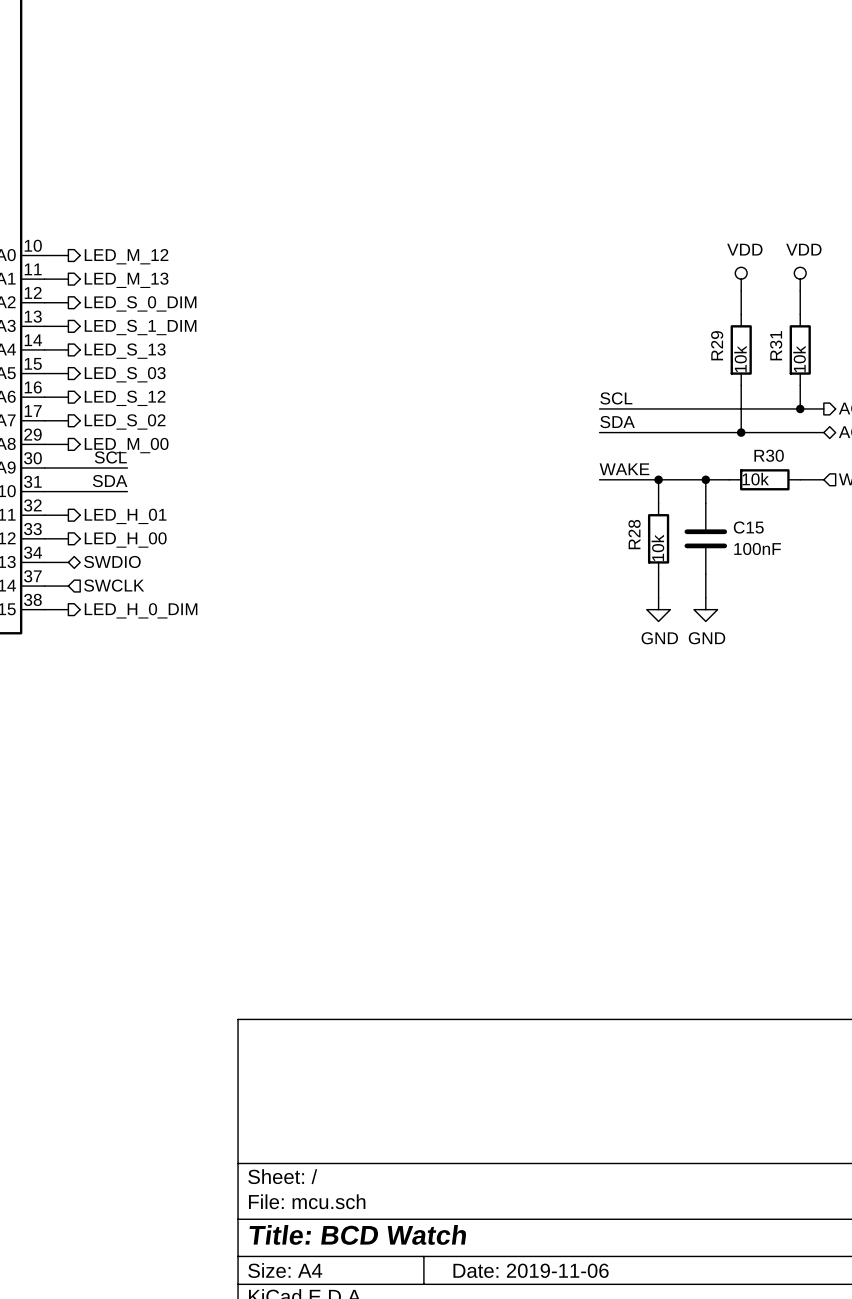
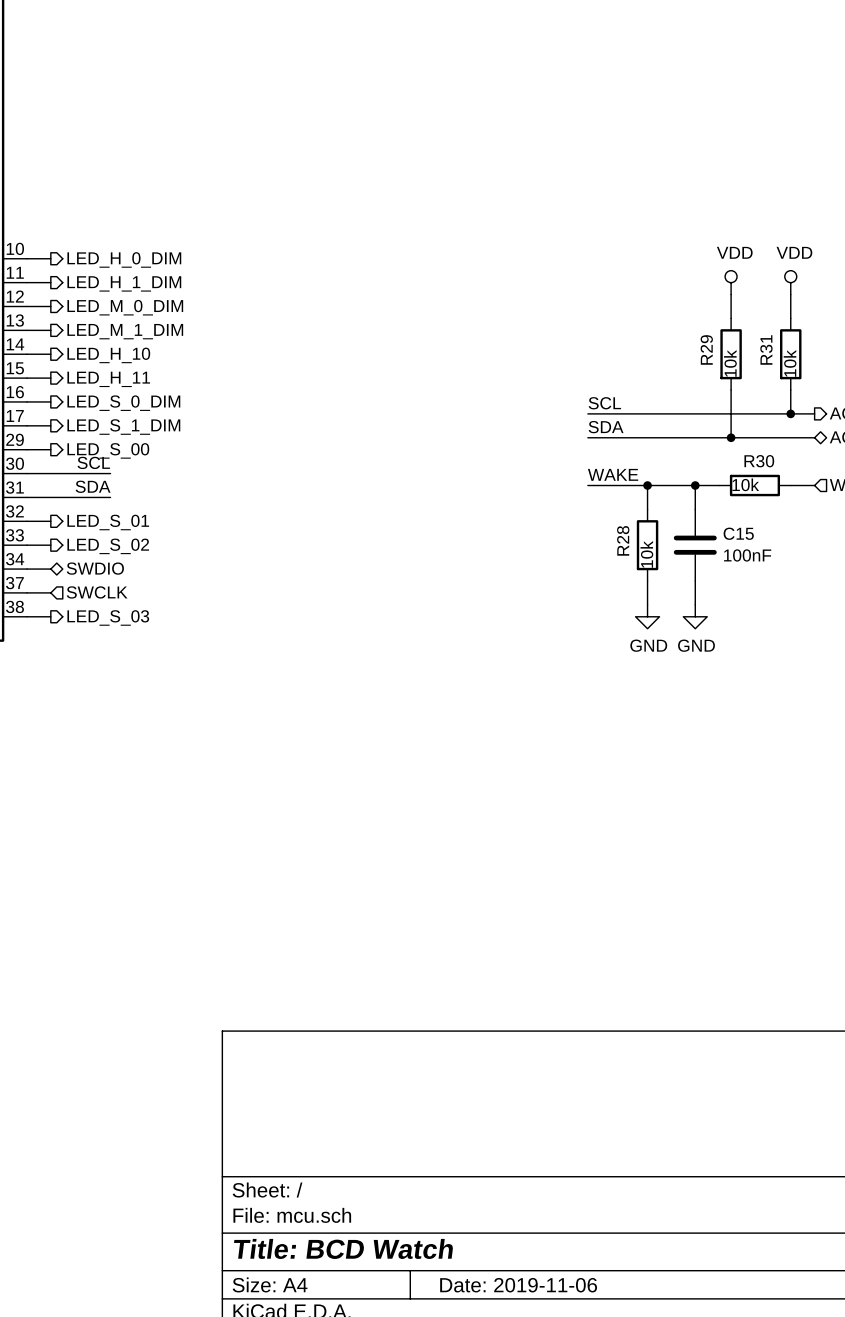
hierarchical label: LED_M_12 (126, 256) -> LED_H_0_DIM (124, 259)
hierarchical label: LED_M_13 (126, 280) -> LED_H_1_DIM (124, 283)
hierarchical label: LED_S_0_DIM (140, 303) -> LED_M_0_DIM (125, 307)
hierarchical label: LED_S_1_DIM (140, 327) -> LED_M_1_DIM (125, 331)
hierarchical label: LED_S_13 (125, 351) -> LED_H_10 (108, 355)
hierarchical label: LED_S_03 (125, 374) -> LED_H_11 (108, 379)
hierarchical label: LED_S_12 (125, 398) -> LED_S_0_DIM (123, 403)
hierarchical label: LED_S_02 (125, 421) -> LED_S_1_DIM (123, 427)
hierarchical label: LED_M_00 (126, 445) -> LED_S_00 (108, 450)
hierarchical label: LED_H_01 (125, 516) -> LED_S_01 (108, 522)
hierarchical label: LED_H_00 (125, 540) -> LED_S_02 (108, 546)
hierarchical label: LED_H_0_DIM (141, 610) -> LED_S_03 (108, 617)

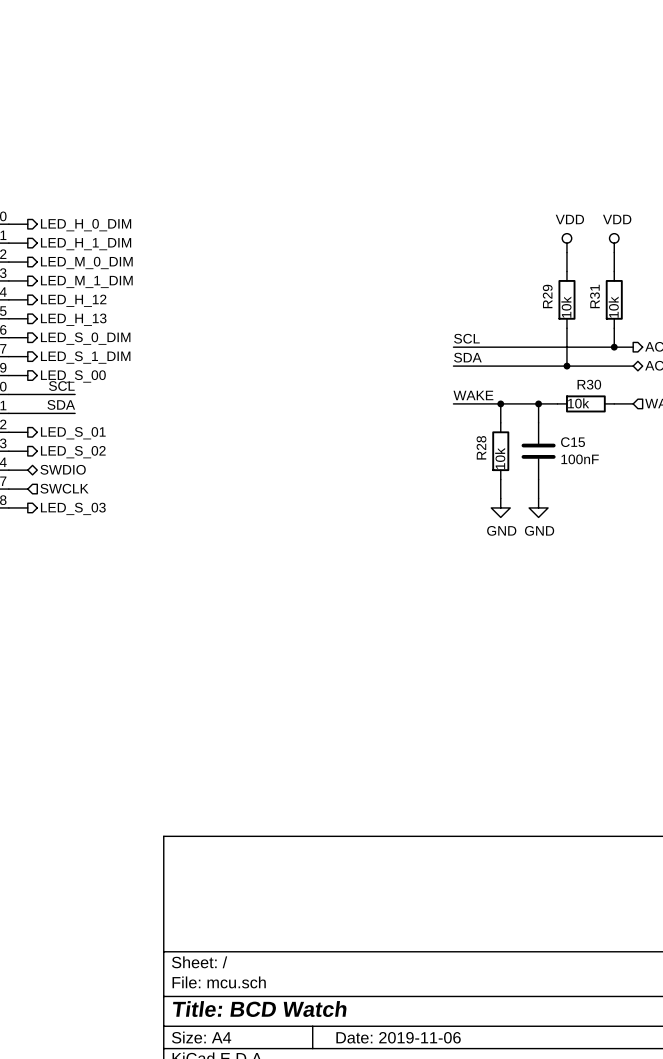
hierarchical label: LED_H_10 (108, 355) -> LED_H_12 (73, 300)
hierarchical label: LED_H_11 (108, 379) -> LED_H_13 (73, 319)

